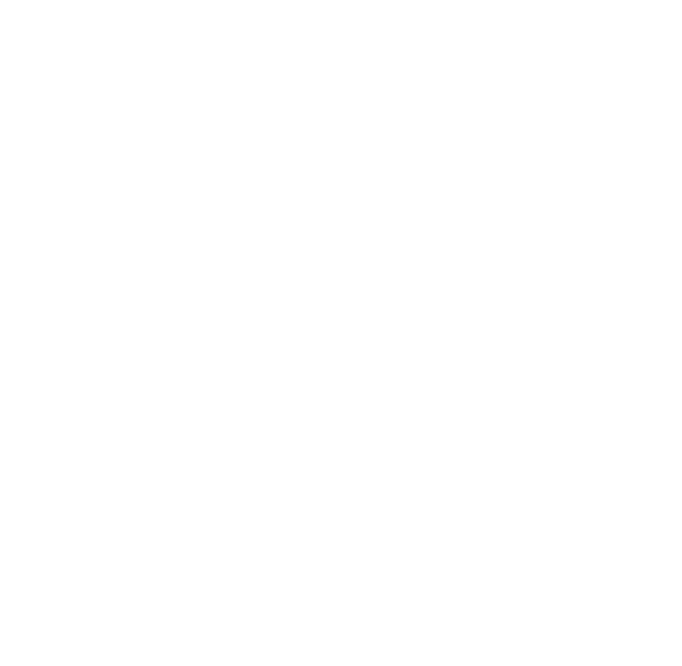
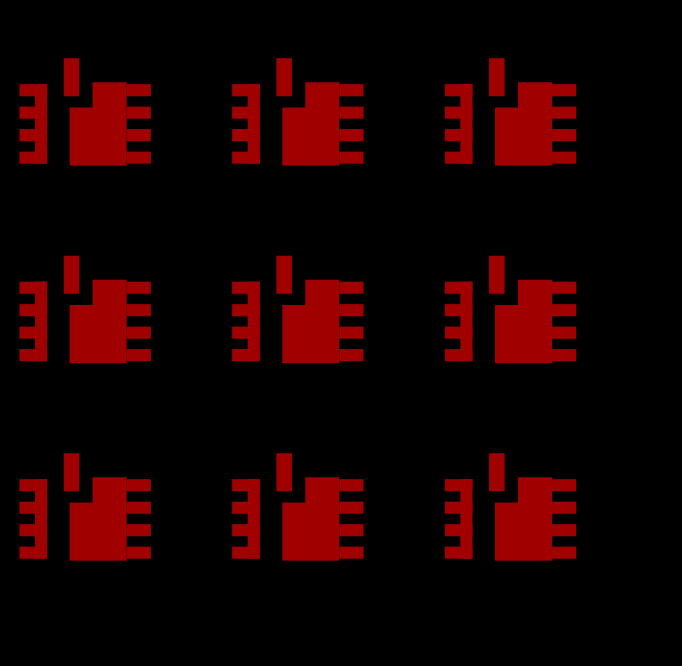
part: none -> (85, 111)
part: none -> (297, 111)
part: none -> (510, 111)
part: none -> (85, 309)
part: none -> (297, 309)
part: none -> (510, 309)
part: none -> (85, 506)
part: none -> (297, 506)
part: none -> (510, 506)

